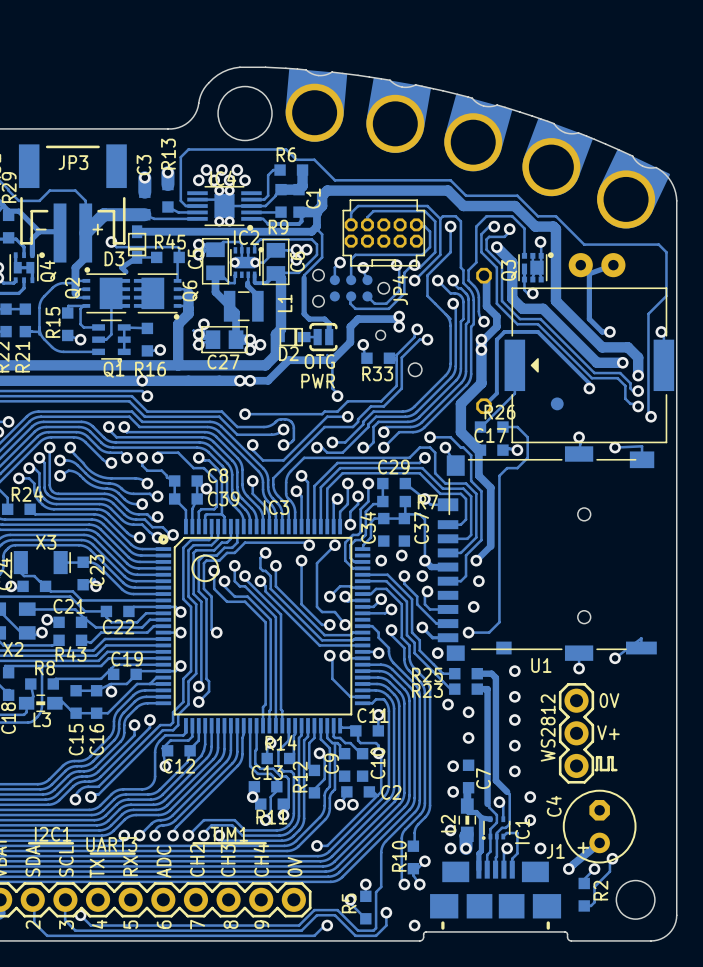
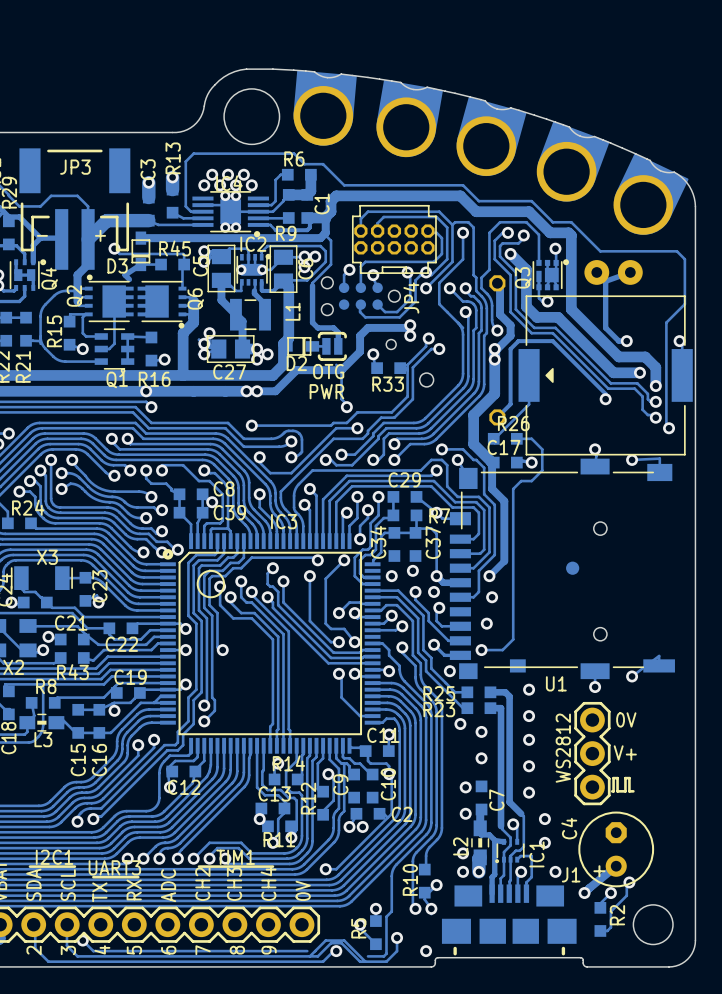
part position: (557, 403) -> (572, 568)
track: (299, 925) (314, 910) (337, 910) (358, 930) -> none
track: none -> (309, 956) (317, 956) (331, 943) (341, 943) (360, 961) (365, 961)

